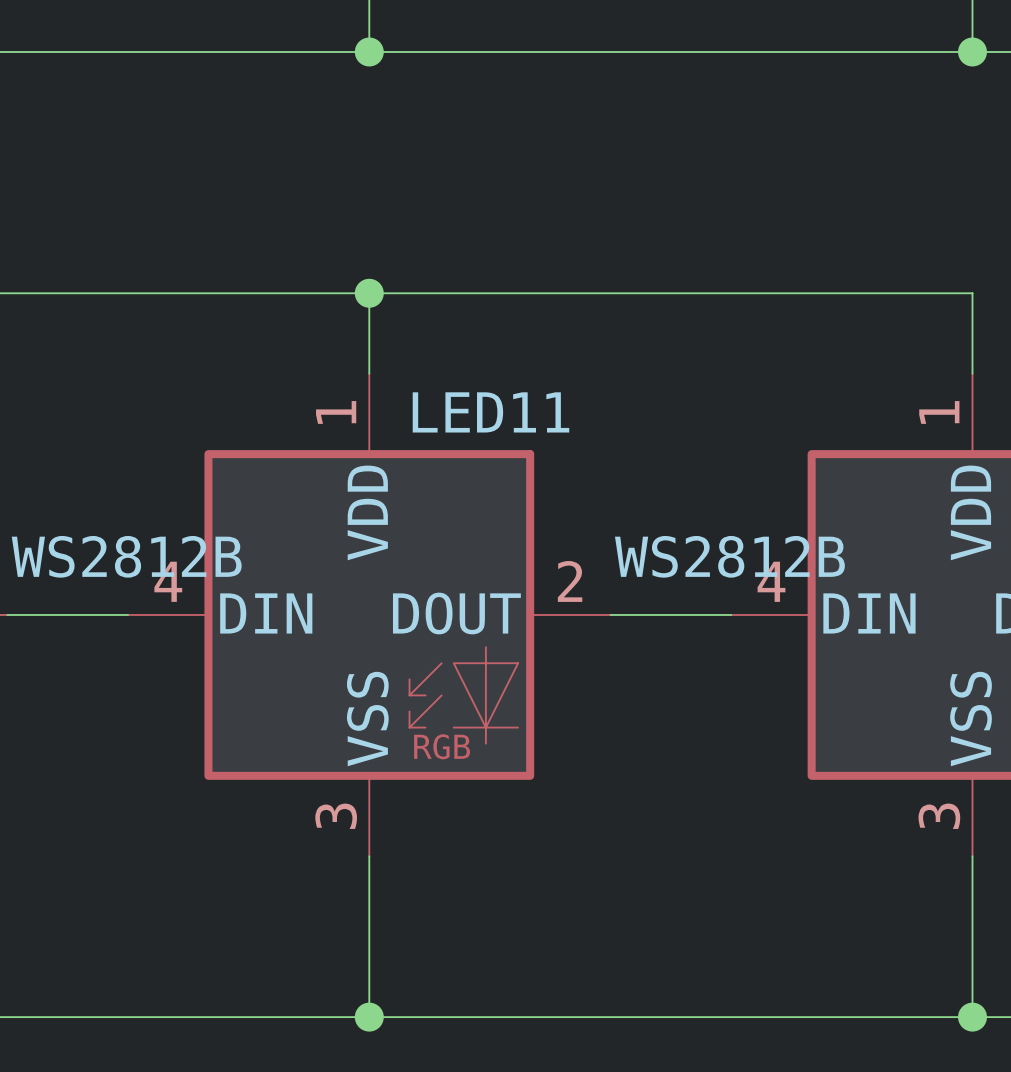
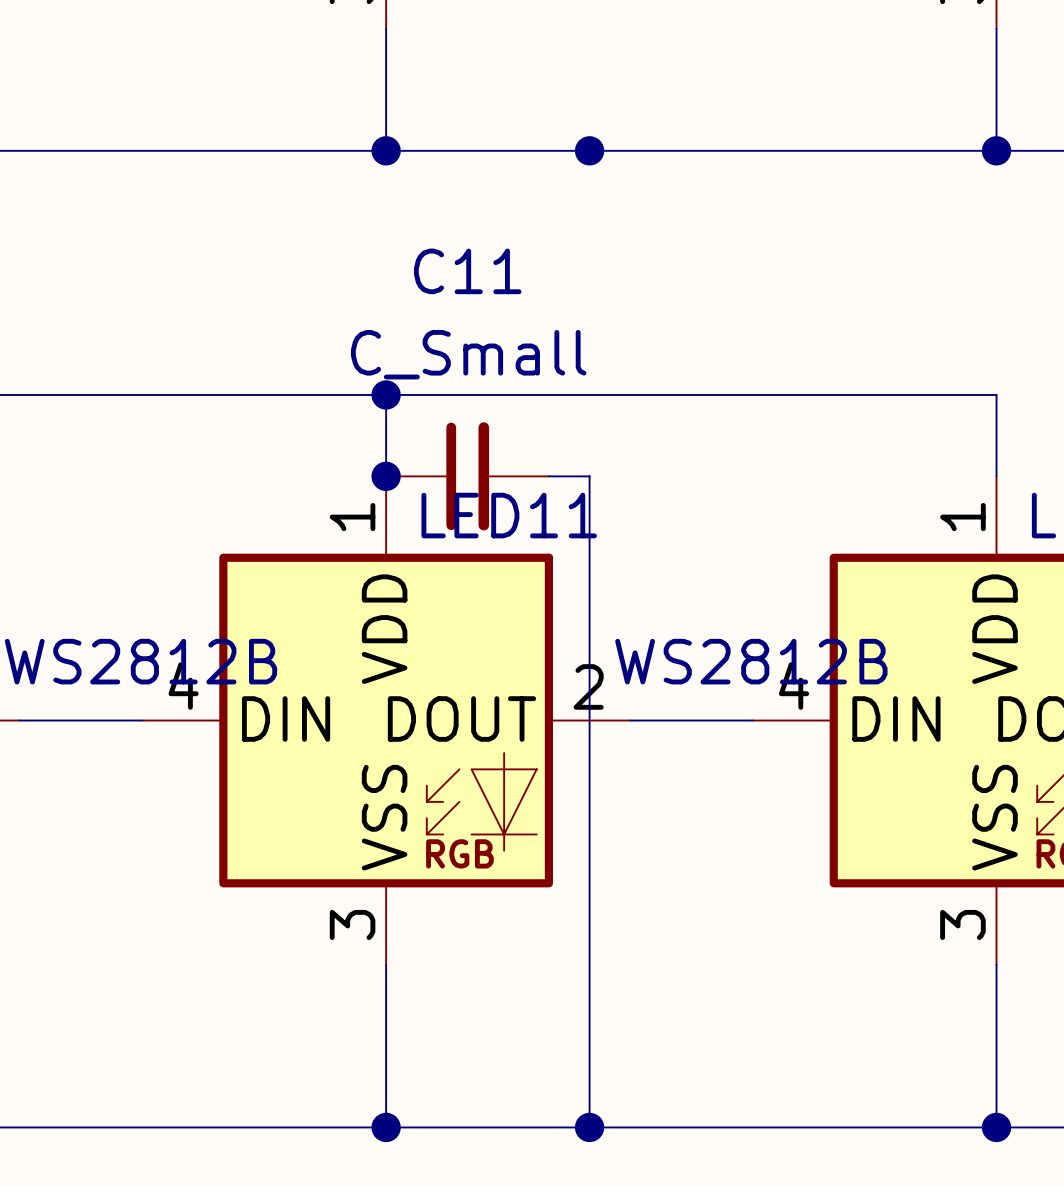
junction: none -> (589, 150)
junction: none -> (386, 476)
C11: none -> C_Small (467, 476)
wire: none -> (548, 476) (589, 476) (589, 1127)
junction: none -> (589, 1127)

